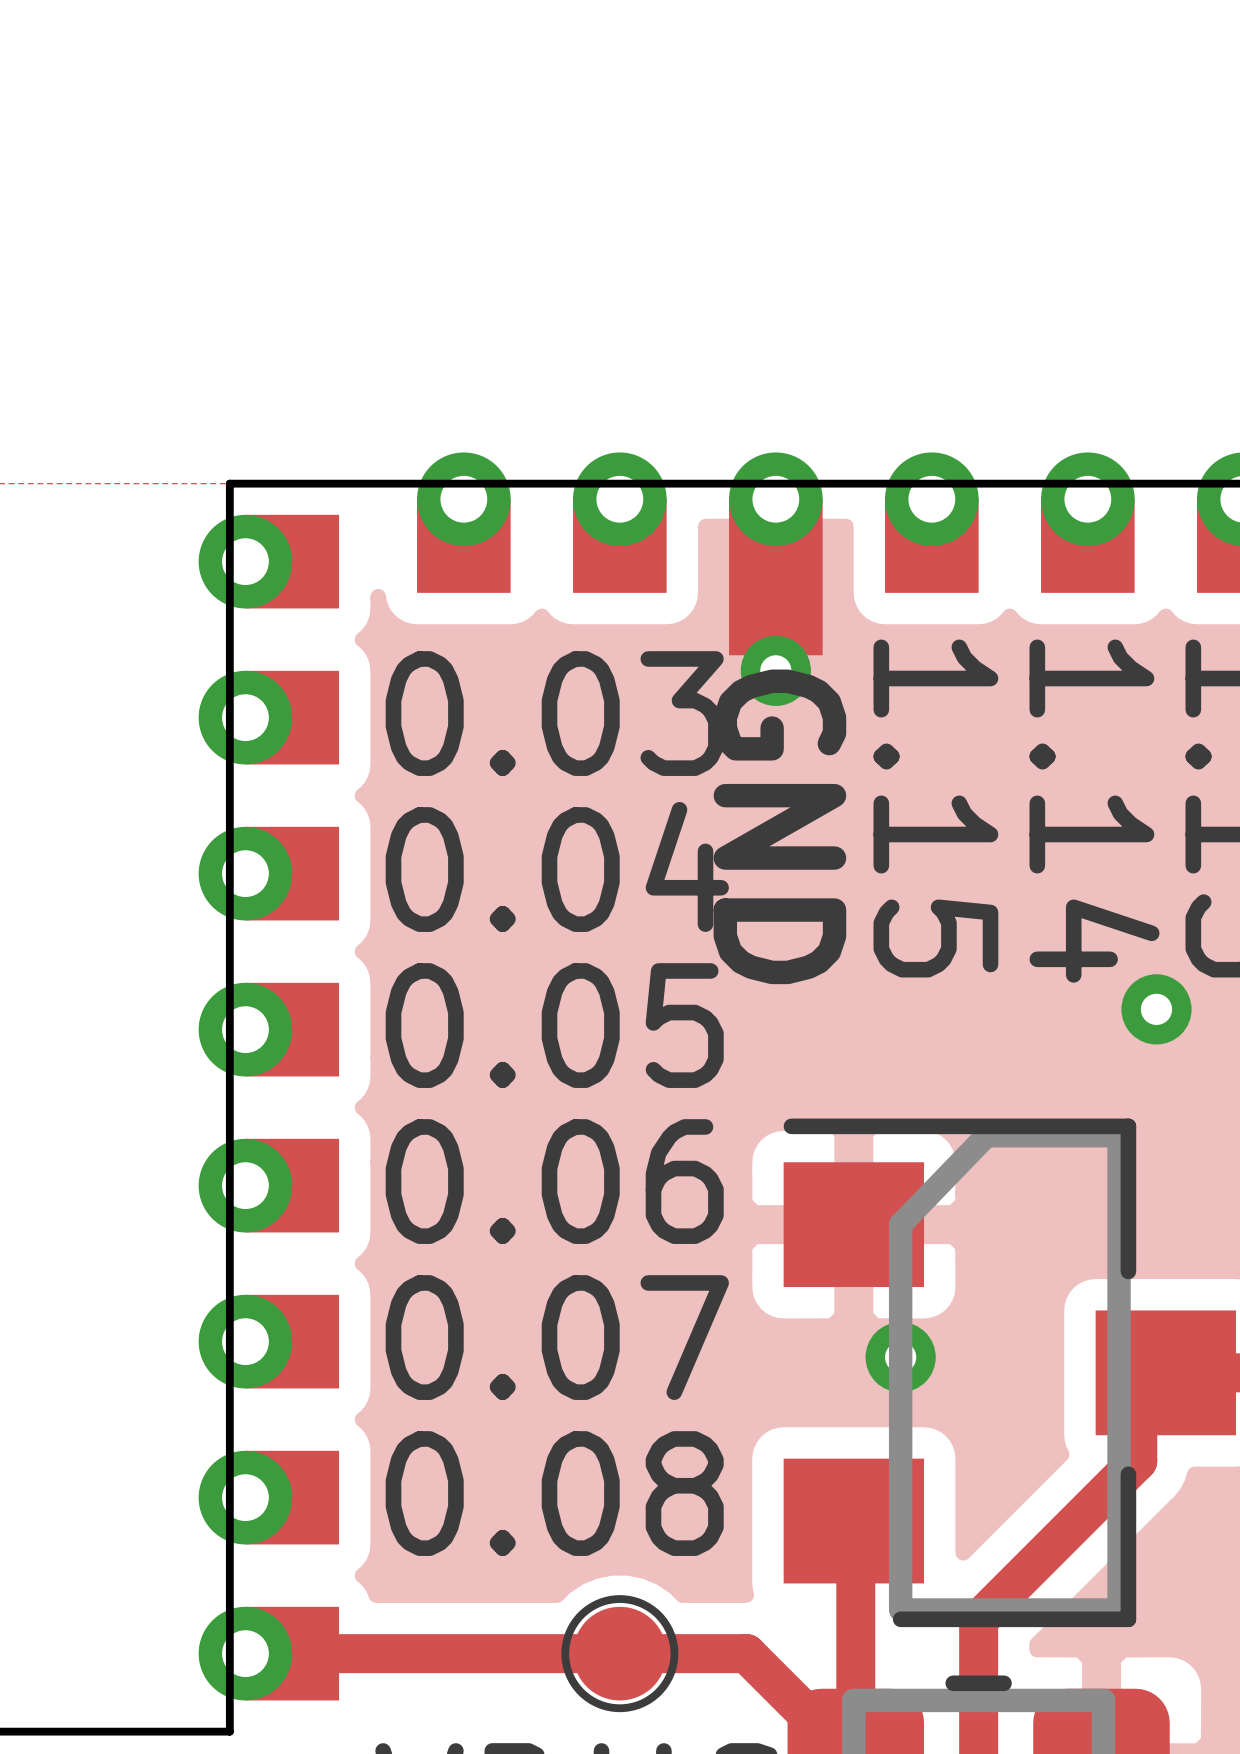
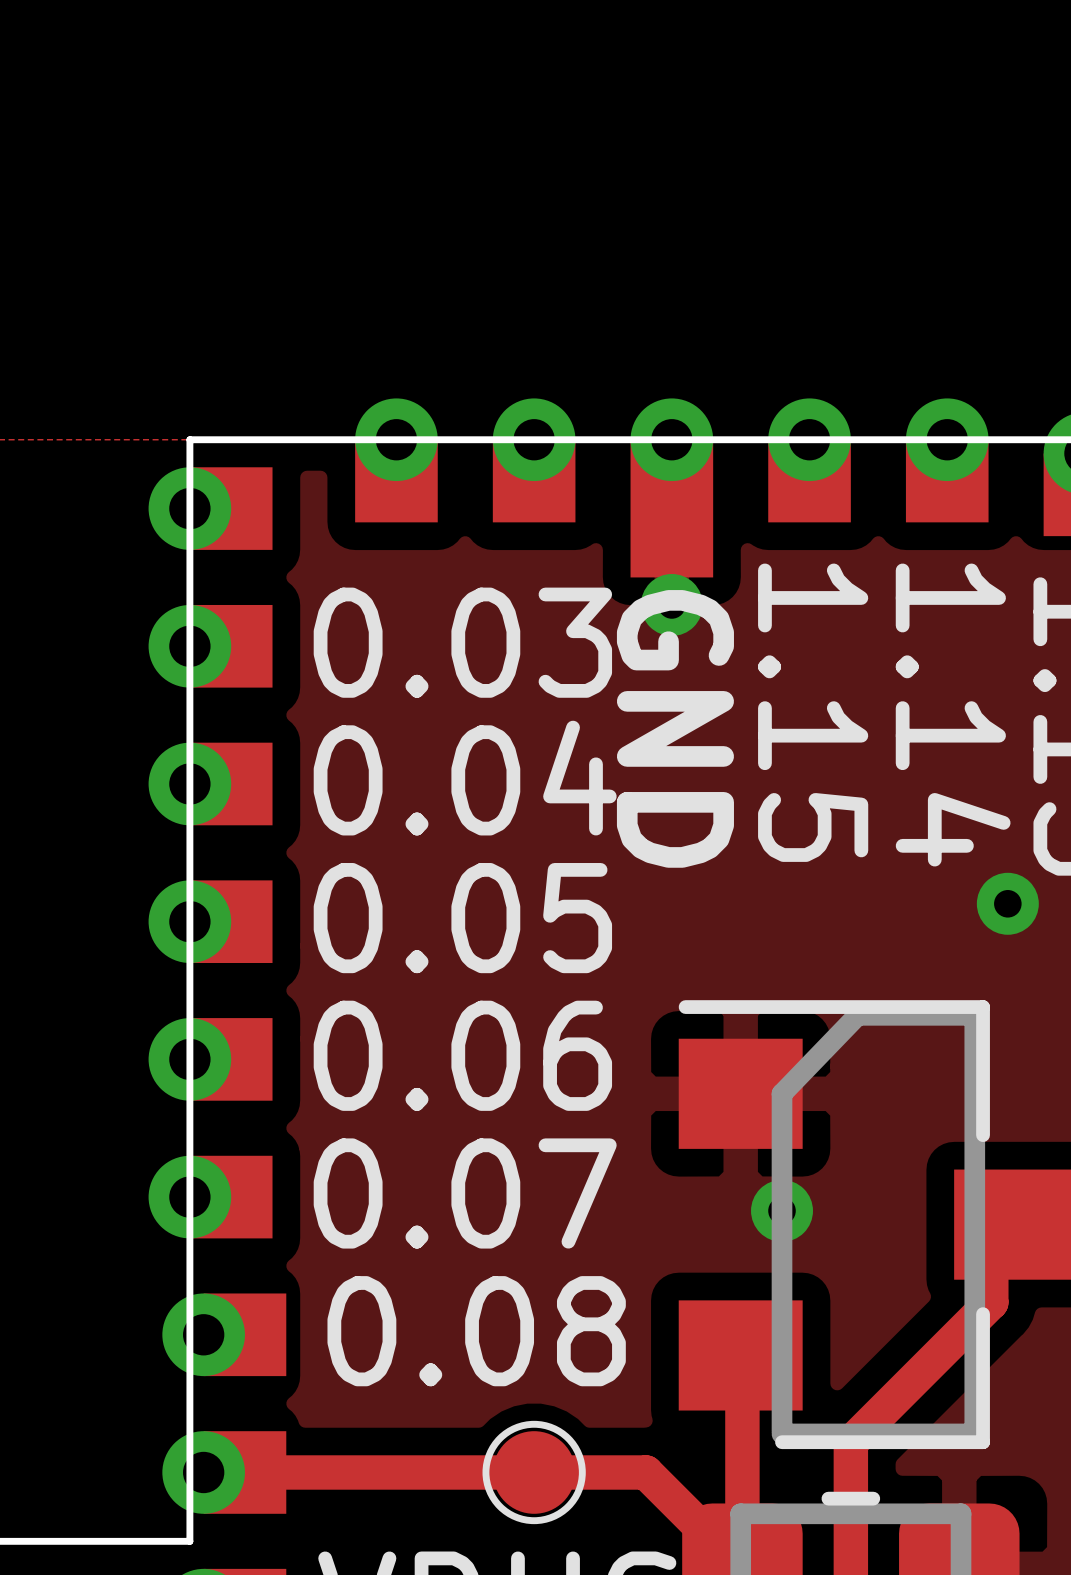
part position: (463, 522) -> (396, 460)
part position: (619, 522) -> (534, 460)
part position: (931, 522) -> (809, 460)
part position: (1087, 522) -> (947, 460)
part position: (775, 553) -> (671, 487)
part position: (268, 561) -> (210, 508)
part position: (268, 717) -> (210, 646)
part position: (268, 873) -> (210, 783)
part position: (268, 1029) -> (210, 921)
part position: (268, 1185) -> (210, 1059)
part position: (268, 1341) -> (210, 1197)

